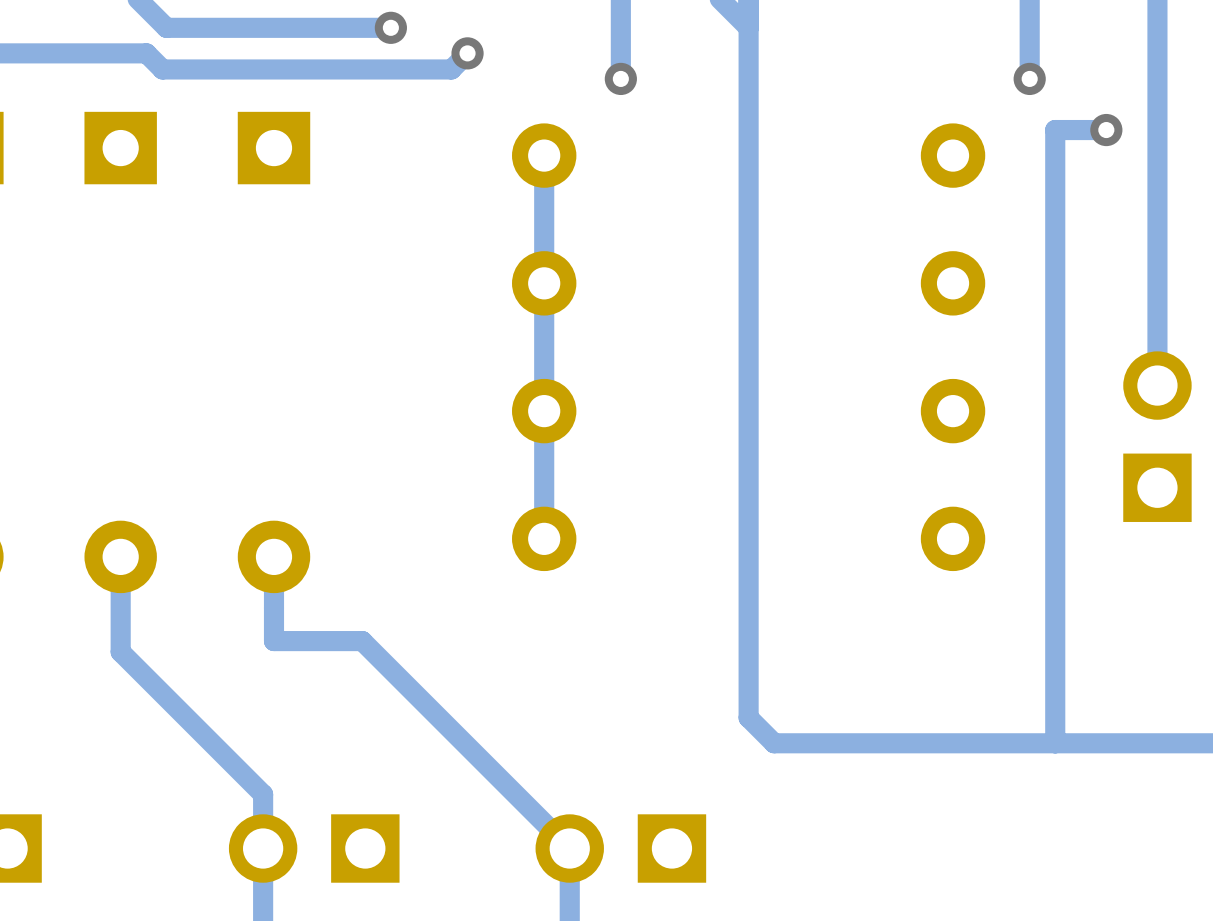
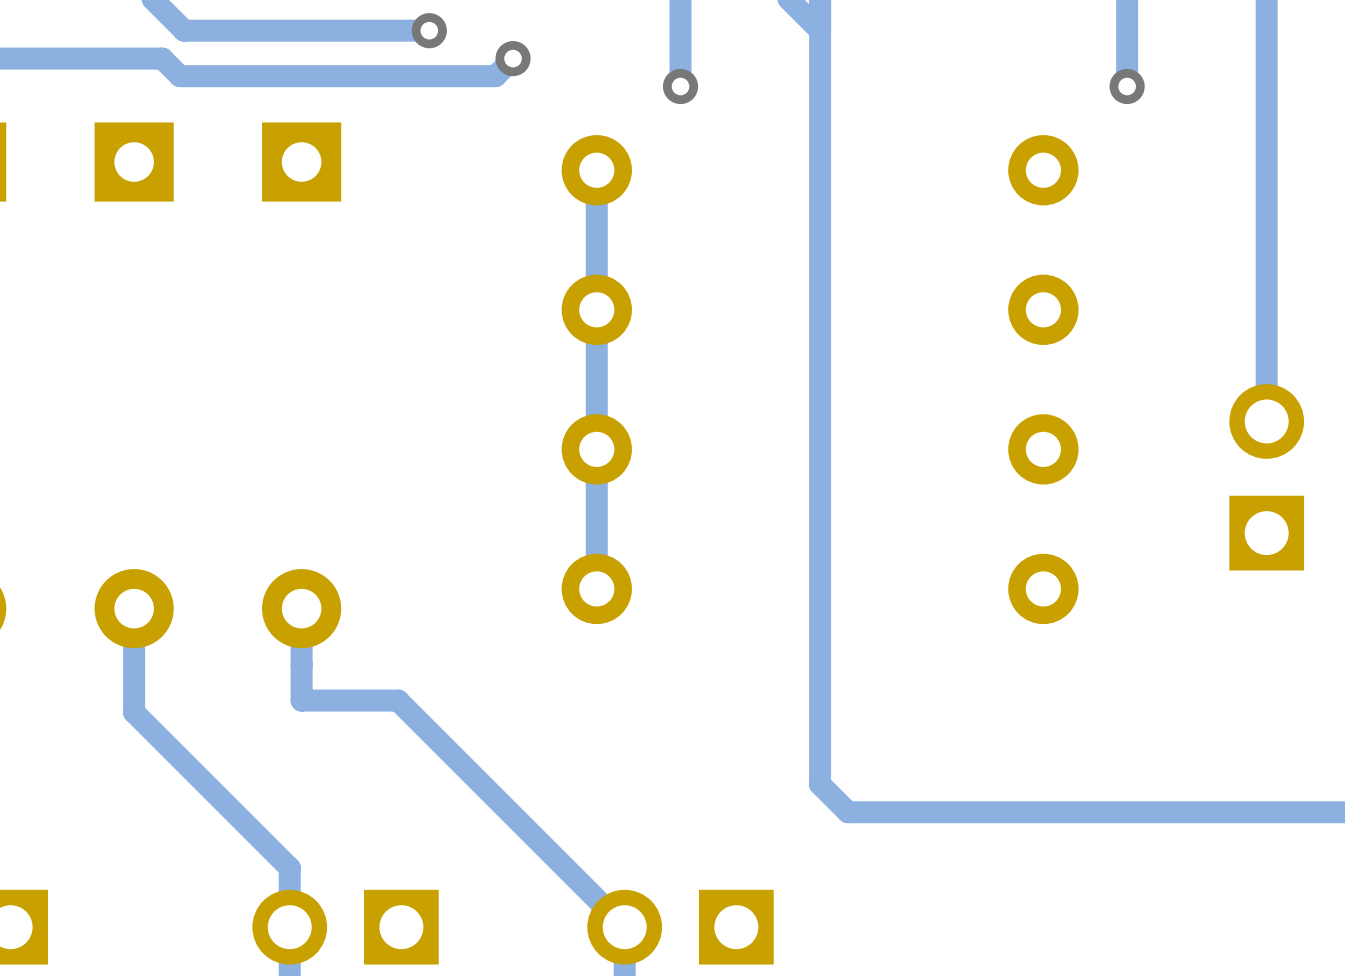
track: (1106, 130) (1055, 130) (1055, 743) -> none
via: (1106, 130) -> none

